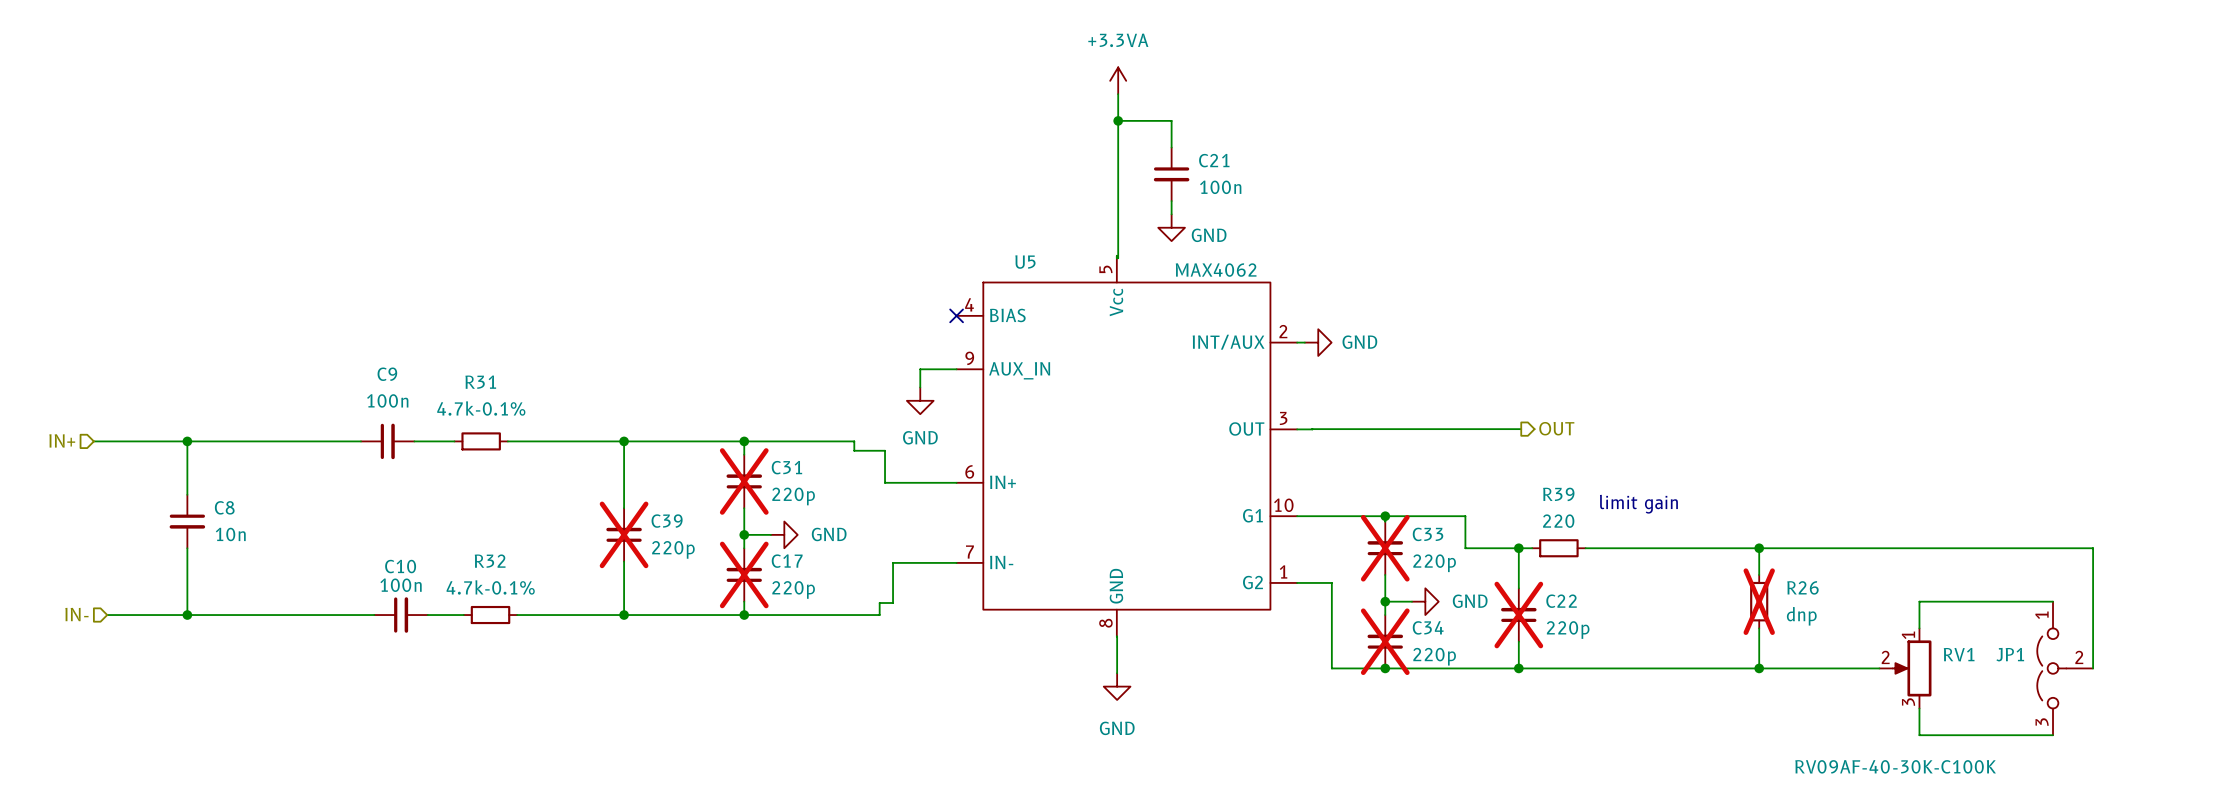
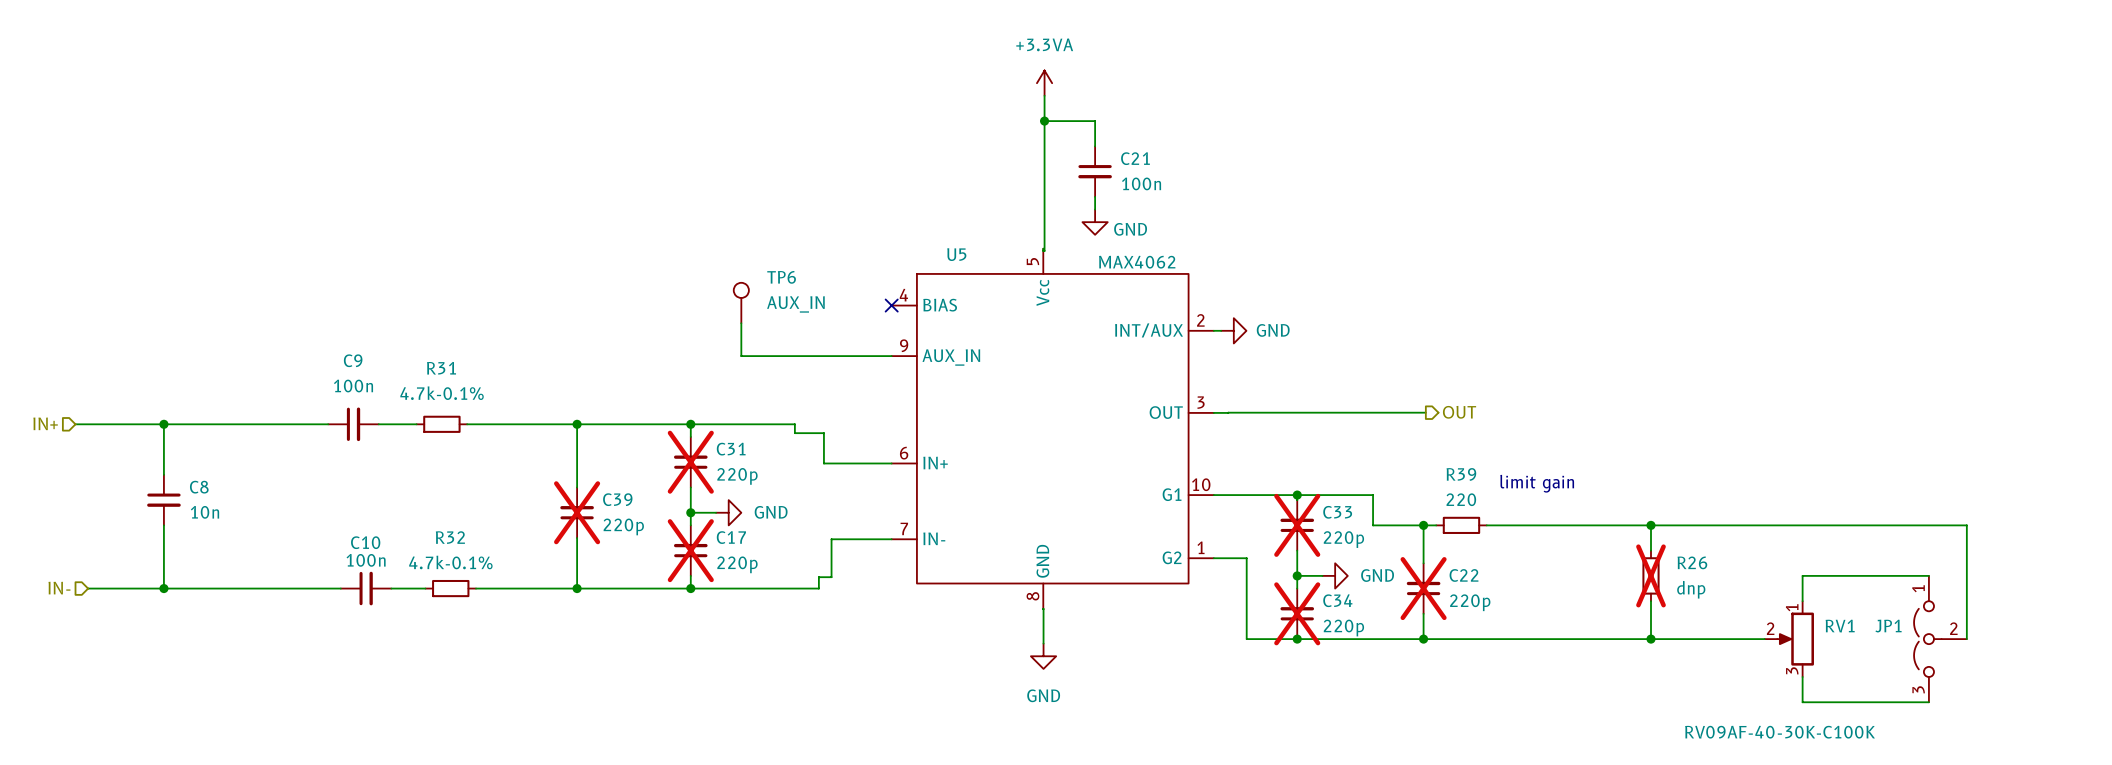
TP6: none -> AUX_IN (741, 303)
wire: (920, 369) (920, 387) -> (857, 356) (741, 356) (741, 323)
power symbol: GND (920, 400) -> none

